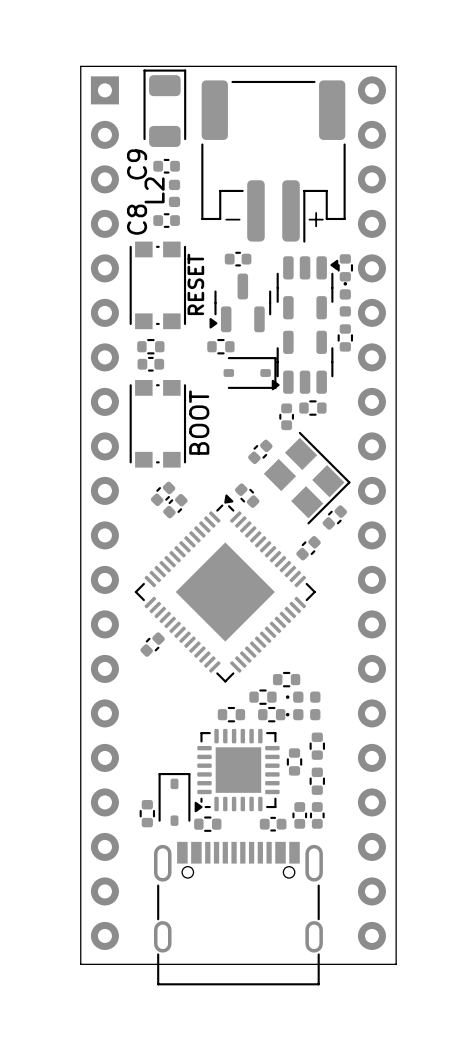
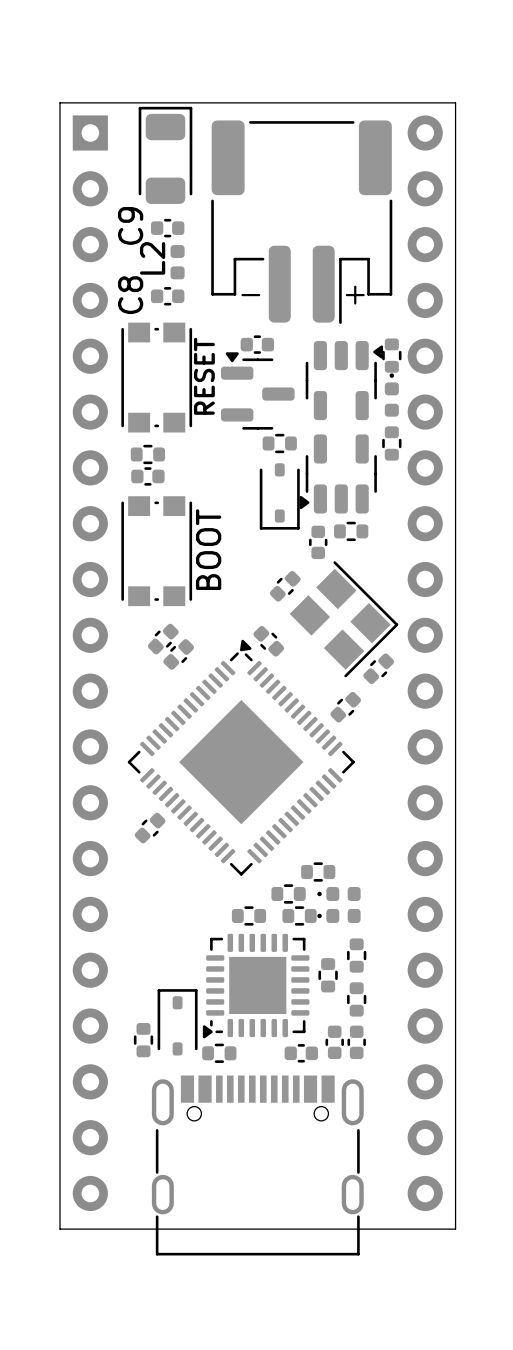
part rotation: 0° (240, 302) -> 90° clockwise (257, 390)
part position: (220, 346) -> (279, 443)
part rotation: 0° (250, 372) -> 90° clockwise (279, 496)

